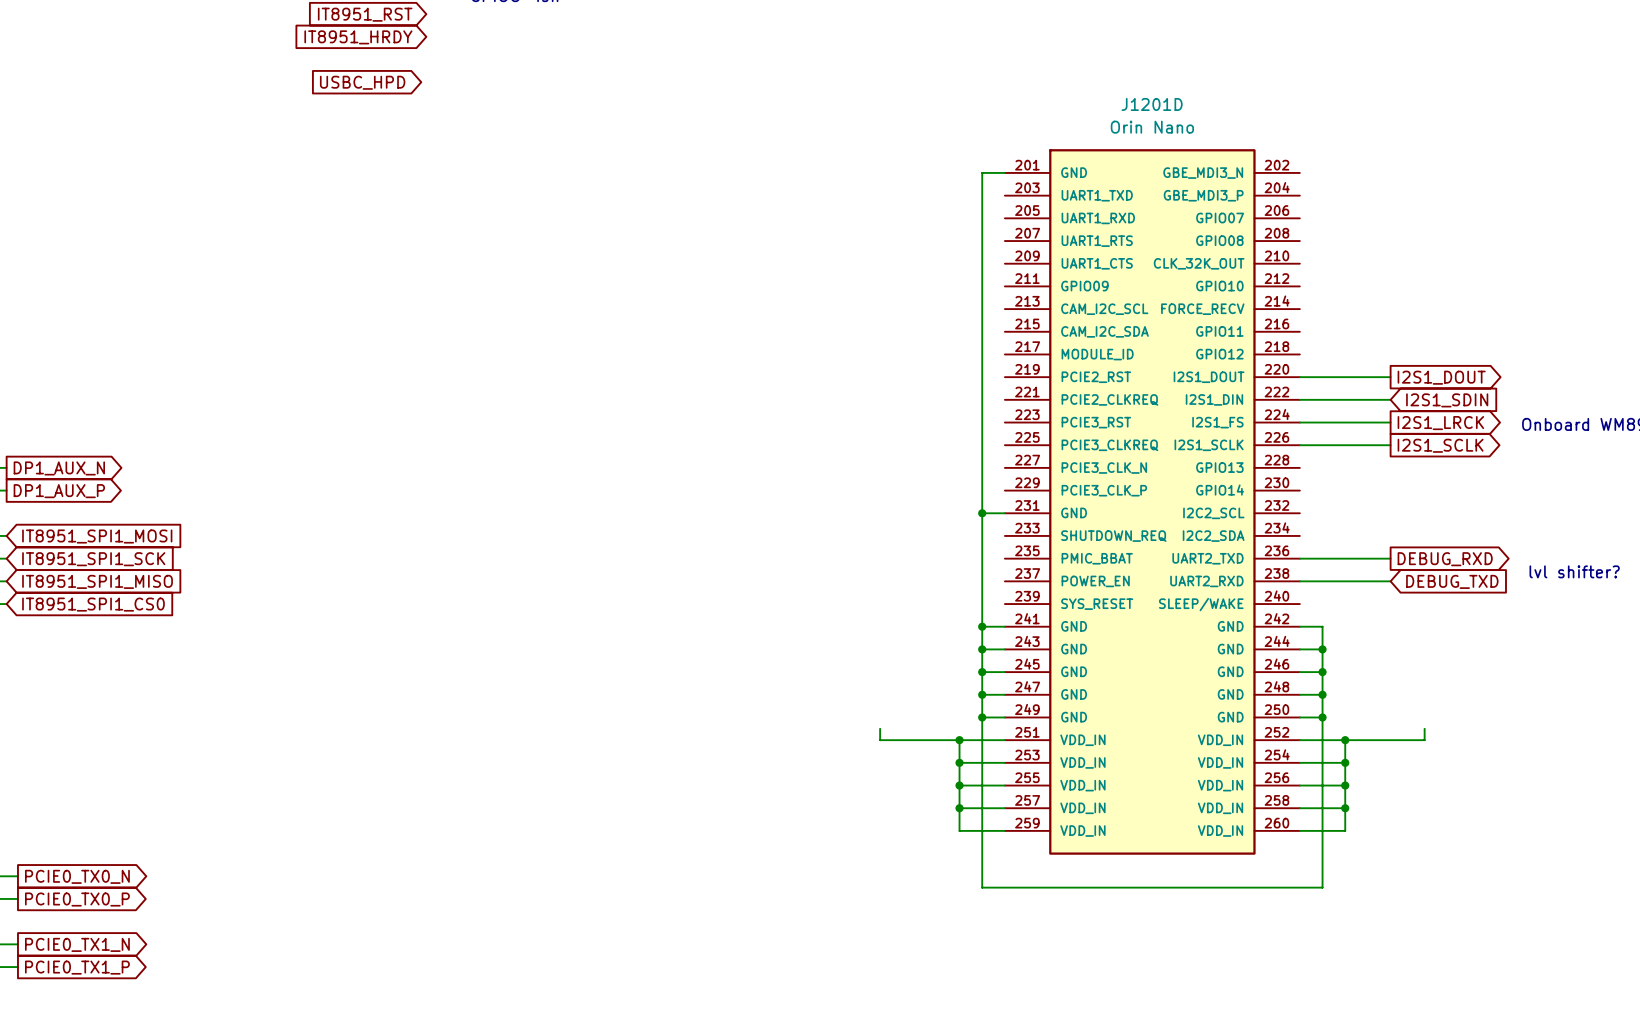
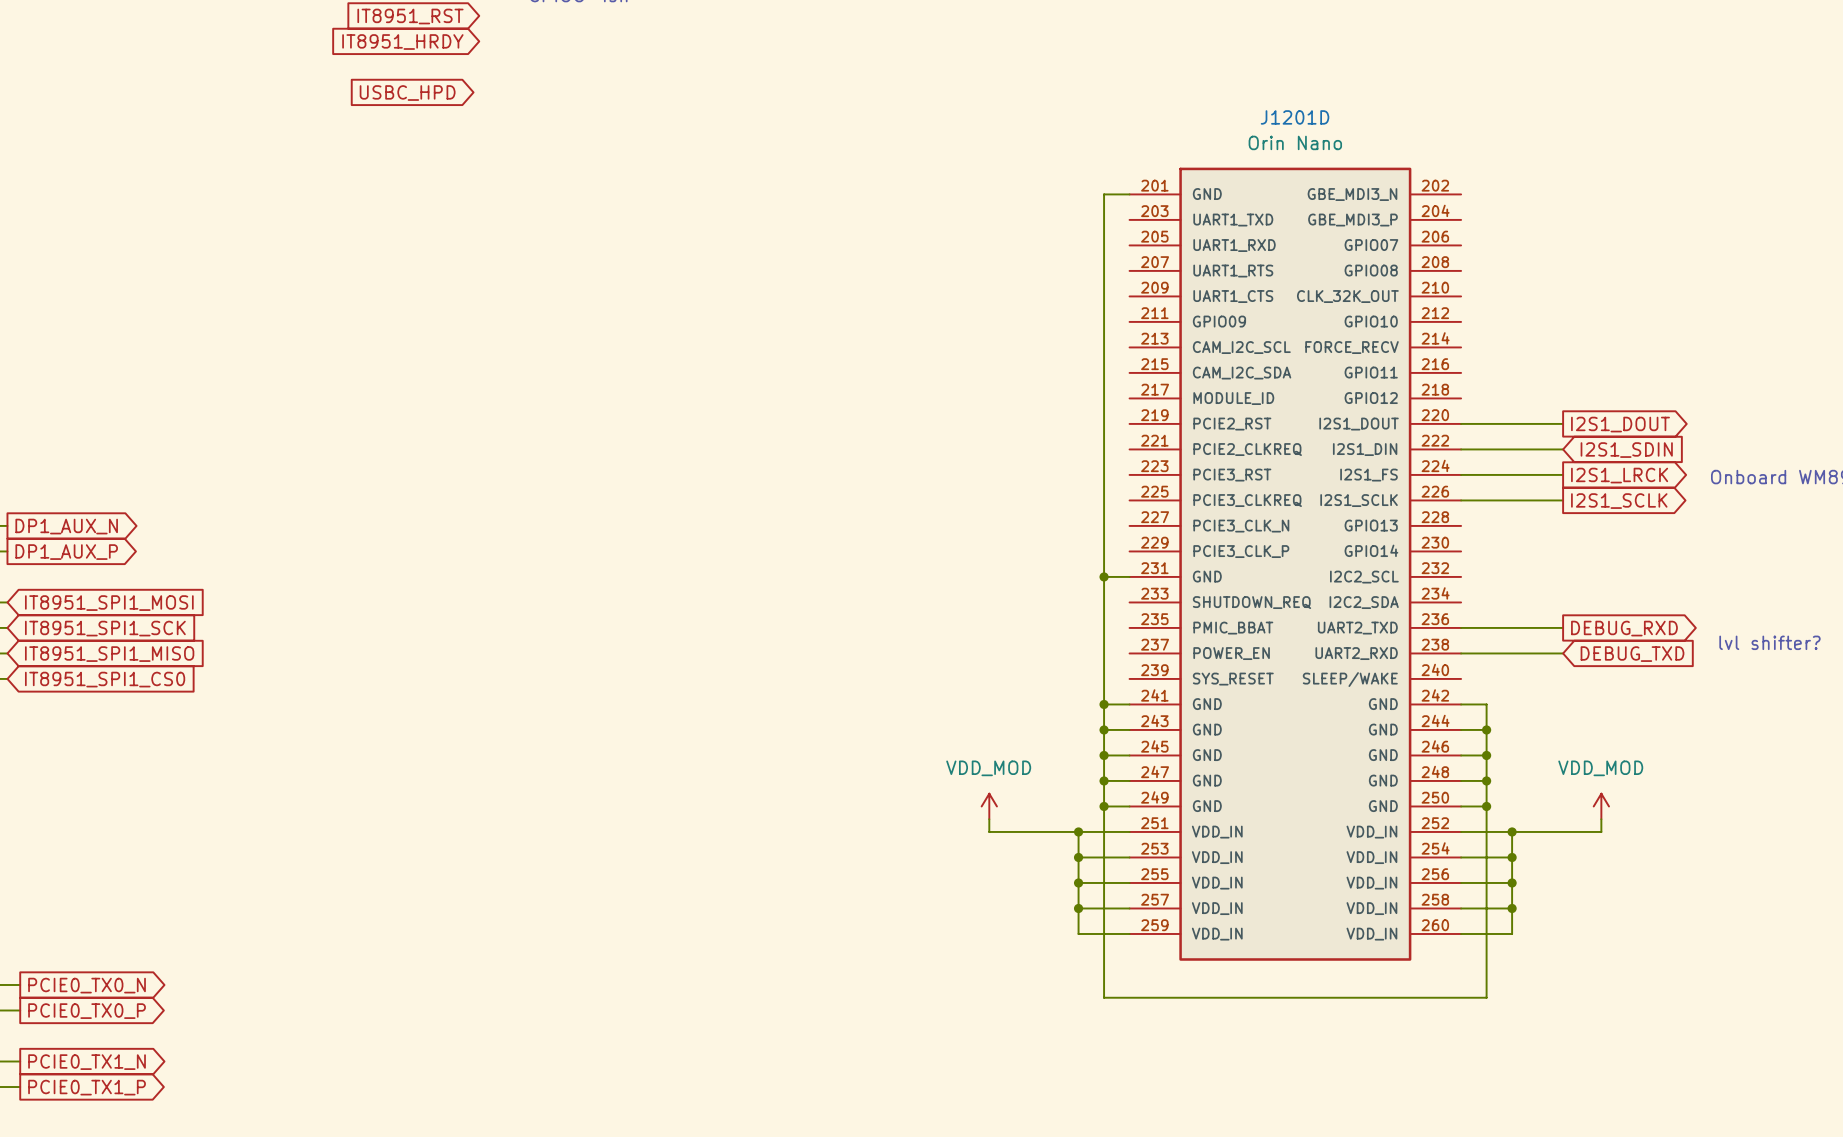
power symbol: none -> VDD_MOD (989, 806)
power symbol: none -> VDD_MOD (1601, 806)

